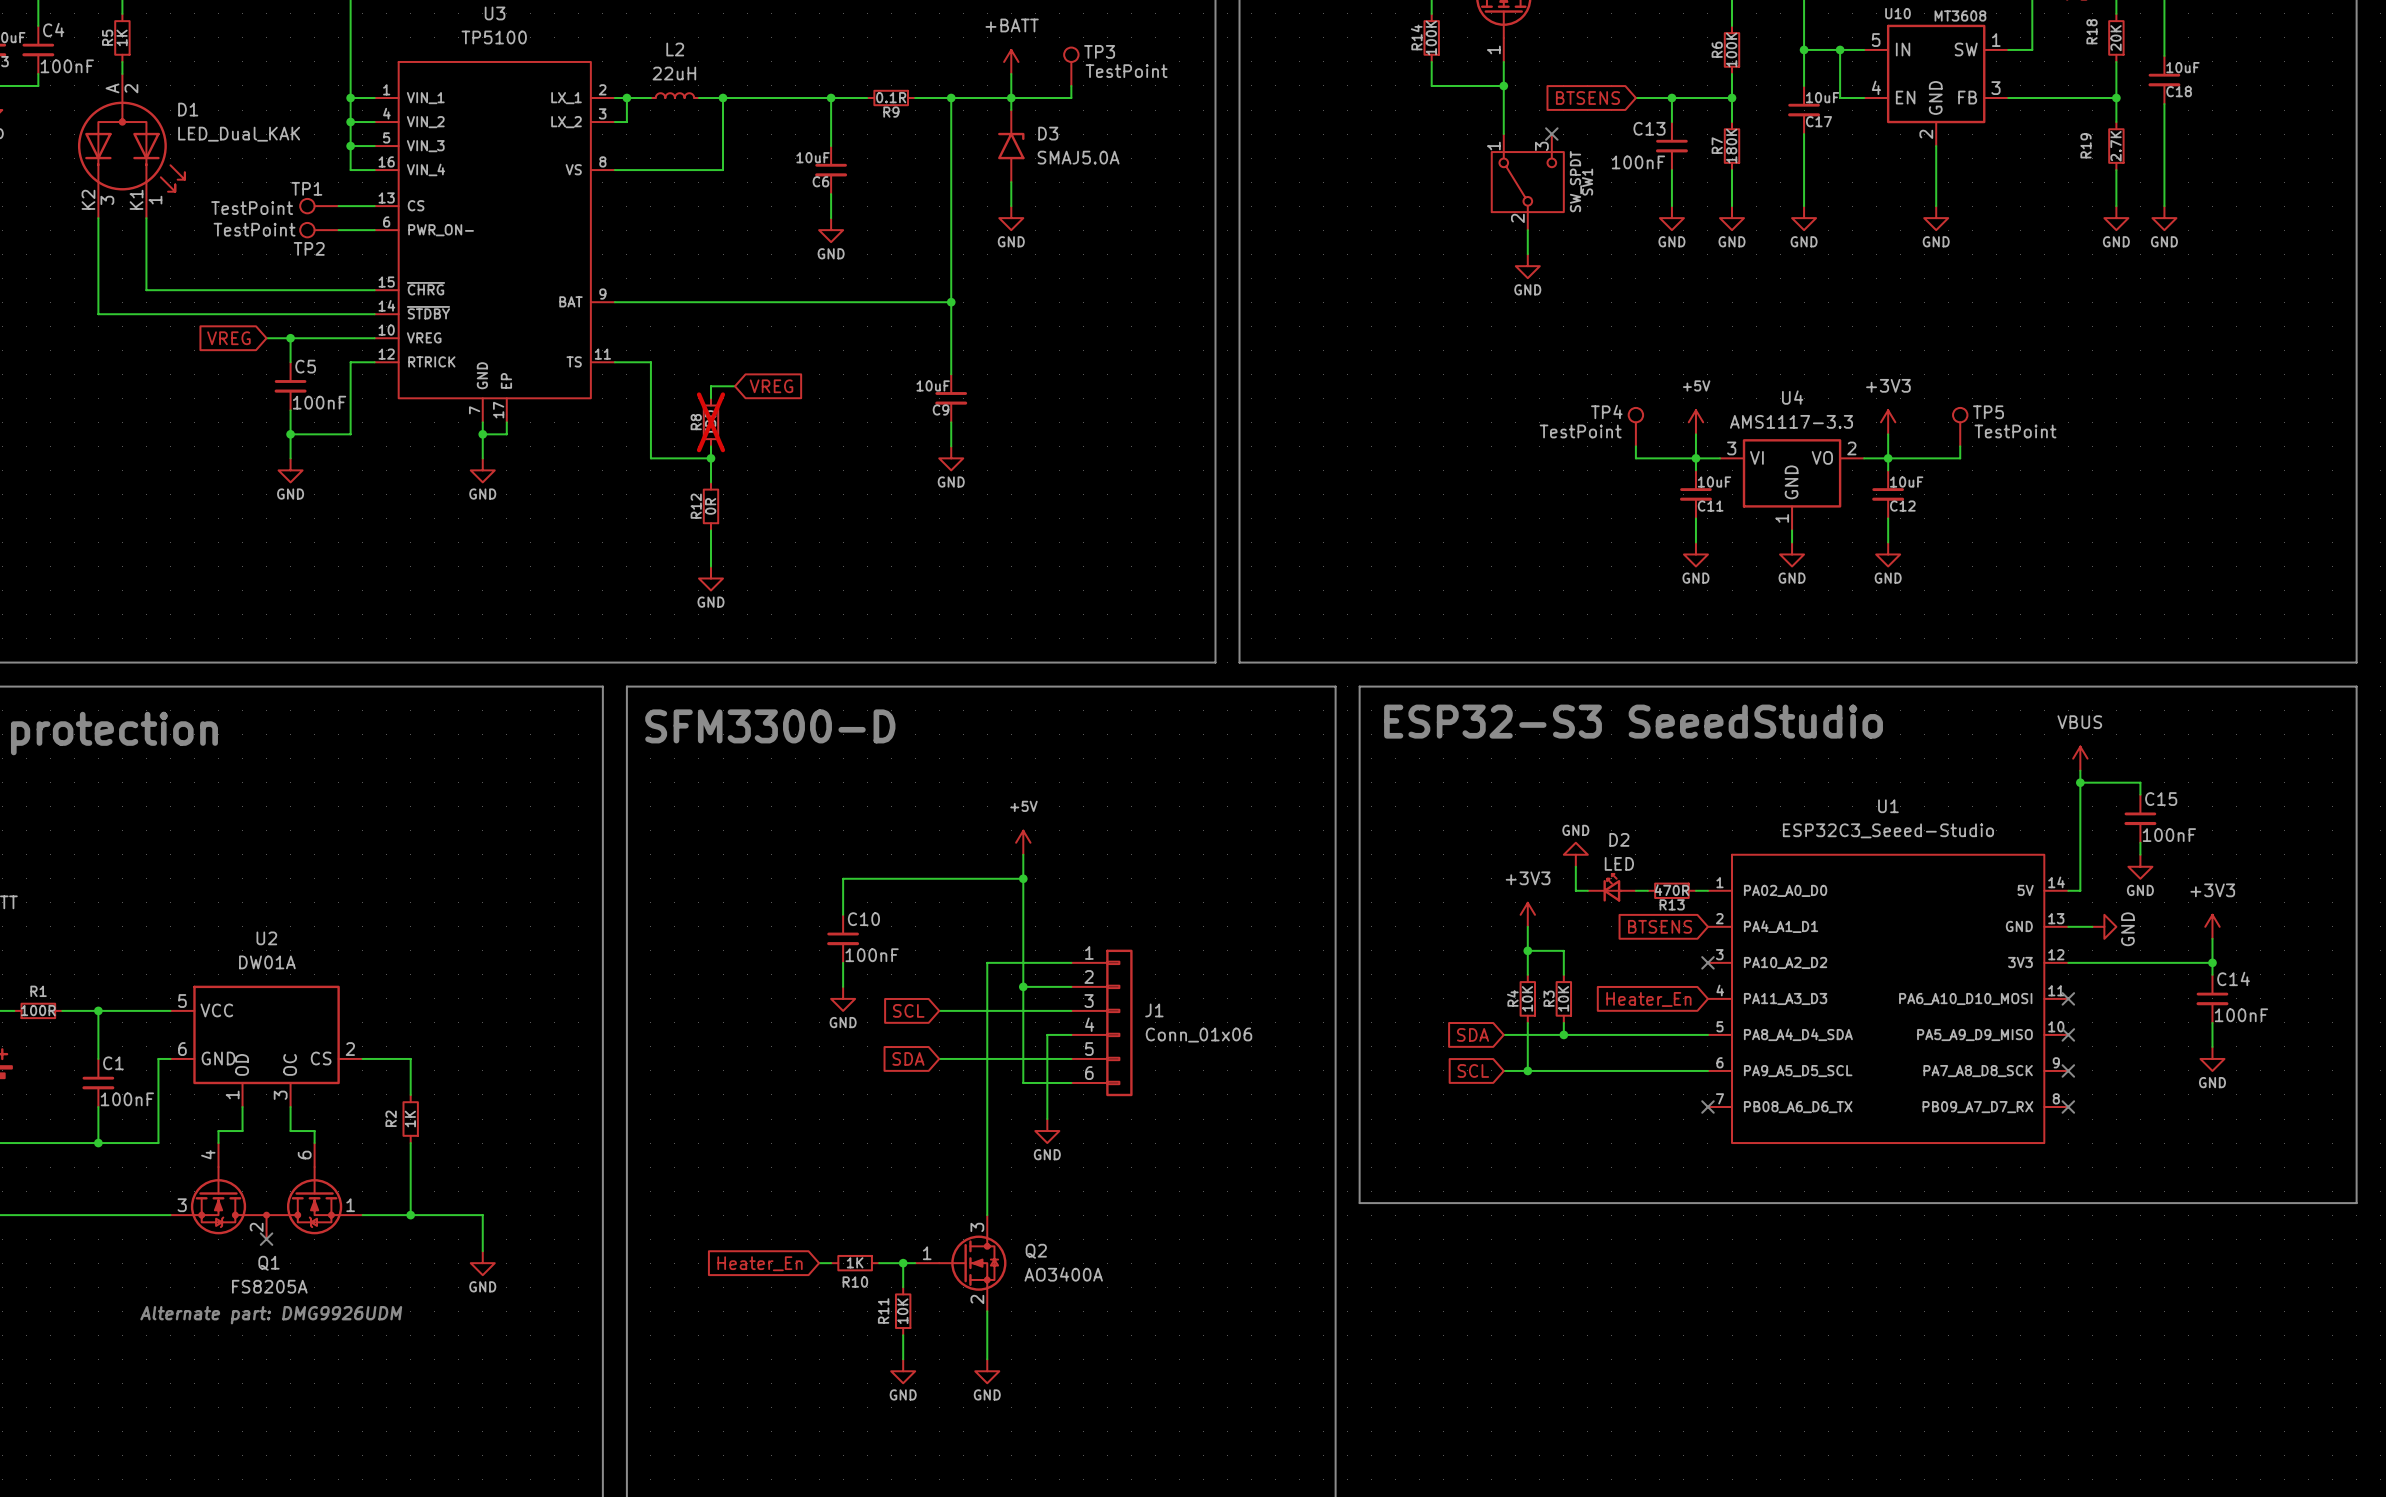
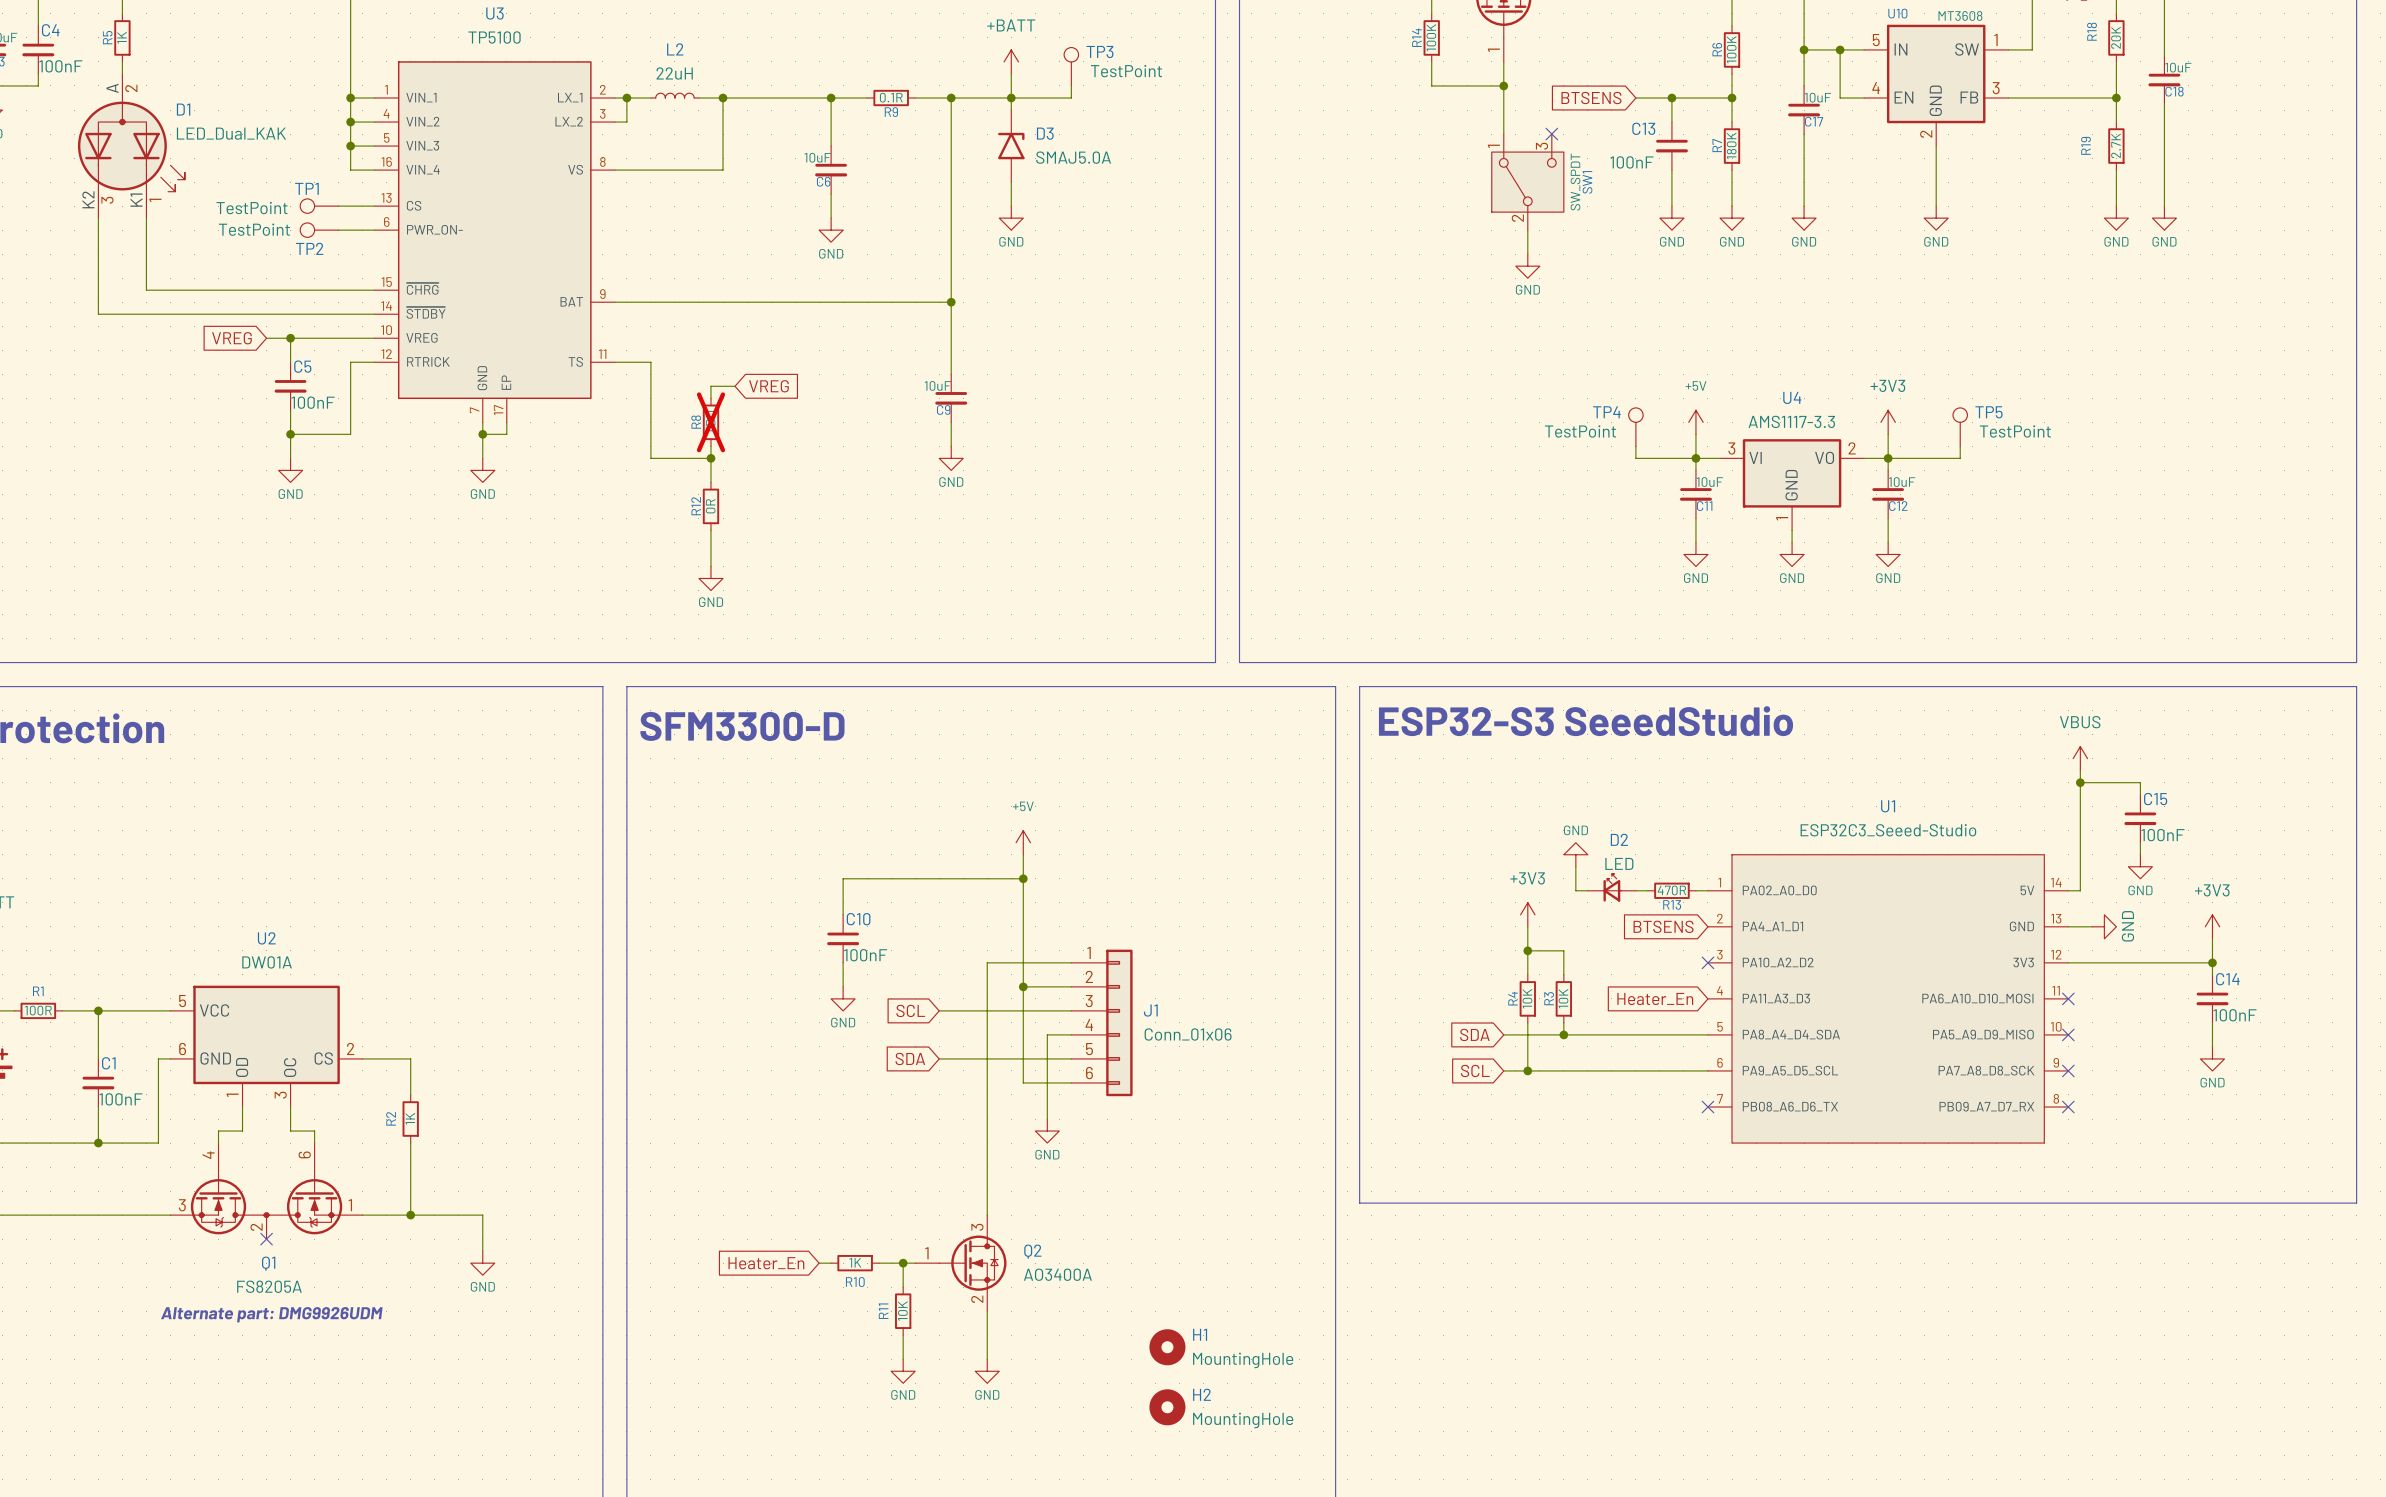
H1: none -> MountingHole (1167, 1347)
H2: none -> MountingHole (1167, 1407)

